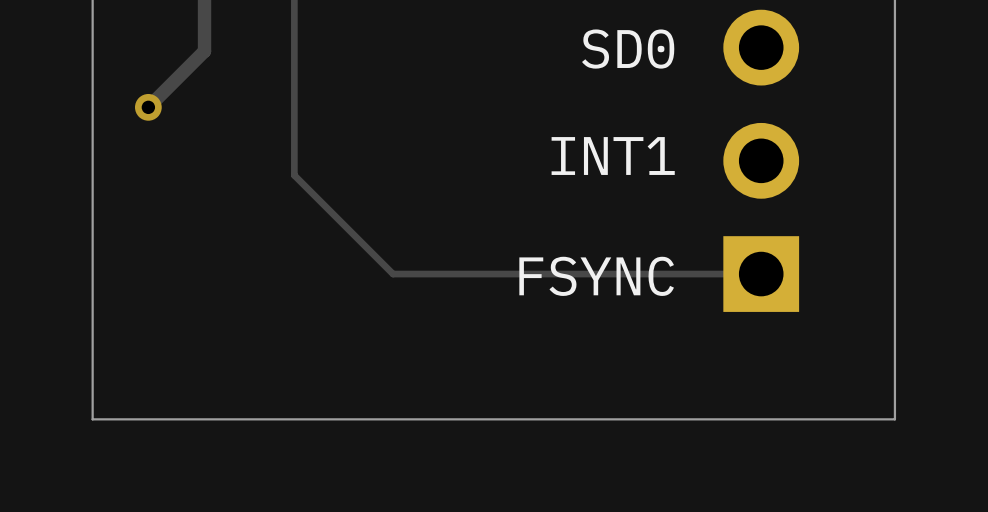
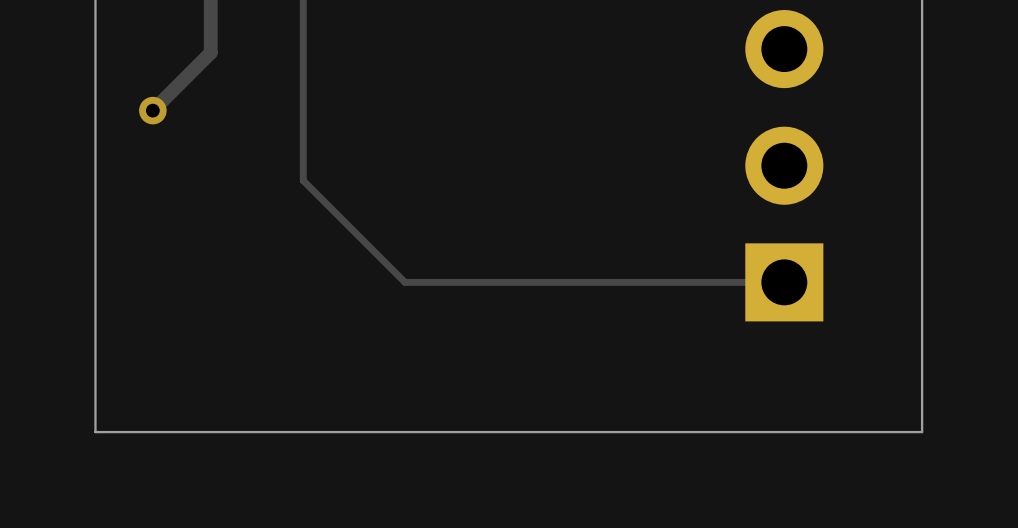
text: SD0 (628, 49) -> none
text: INT1 (613, 156) -> none
text: FSYNC (596, 276) -> none

